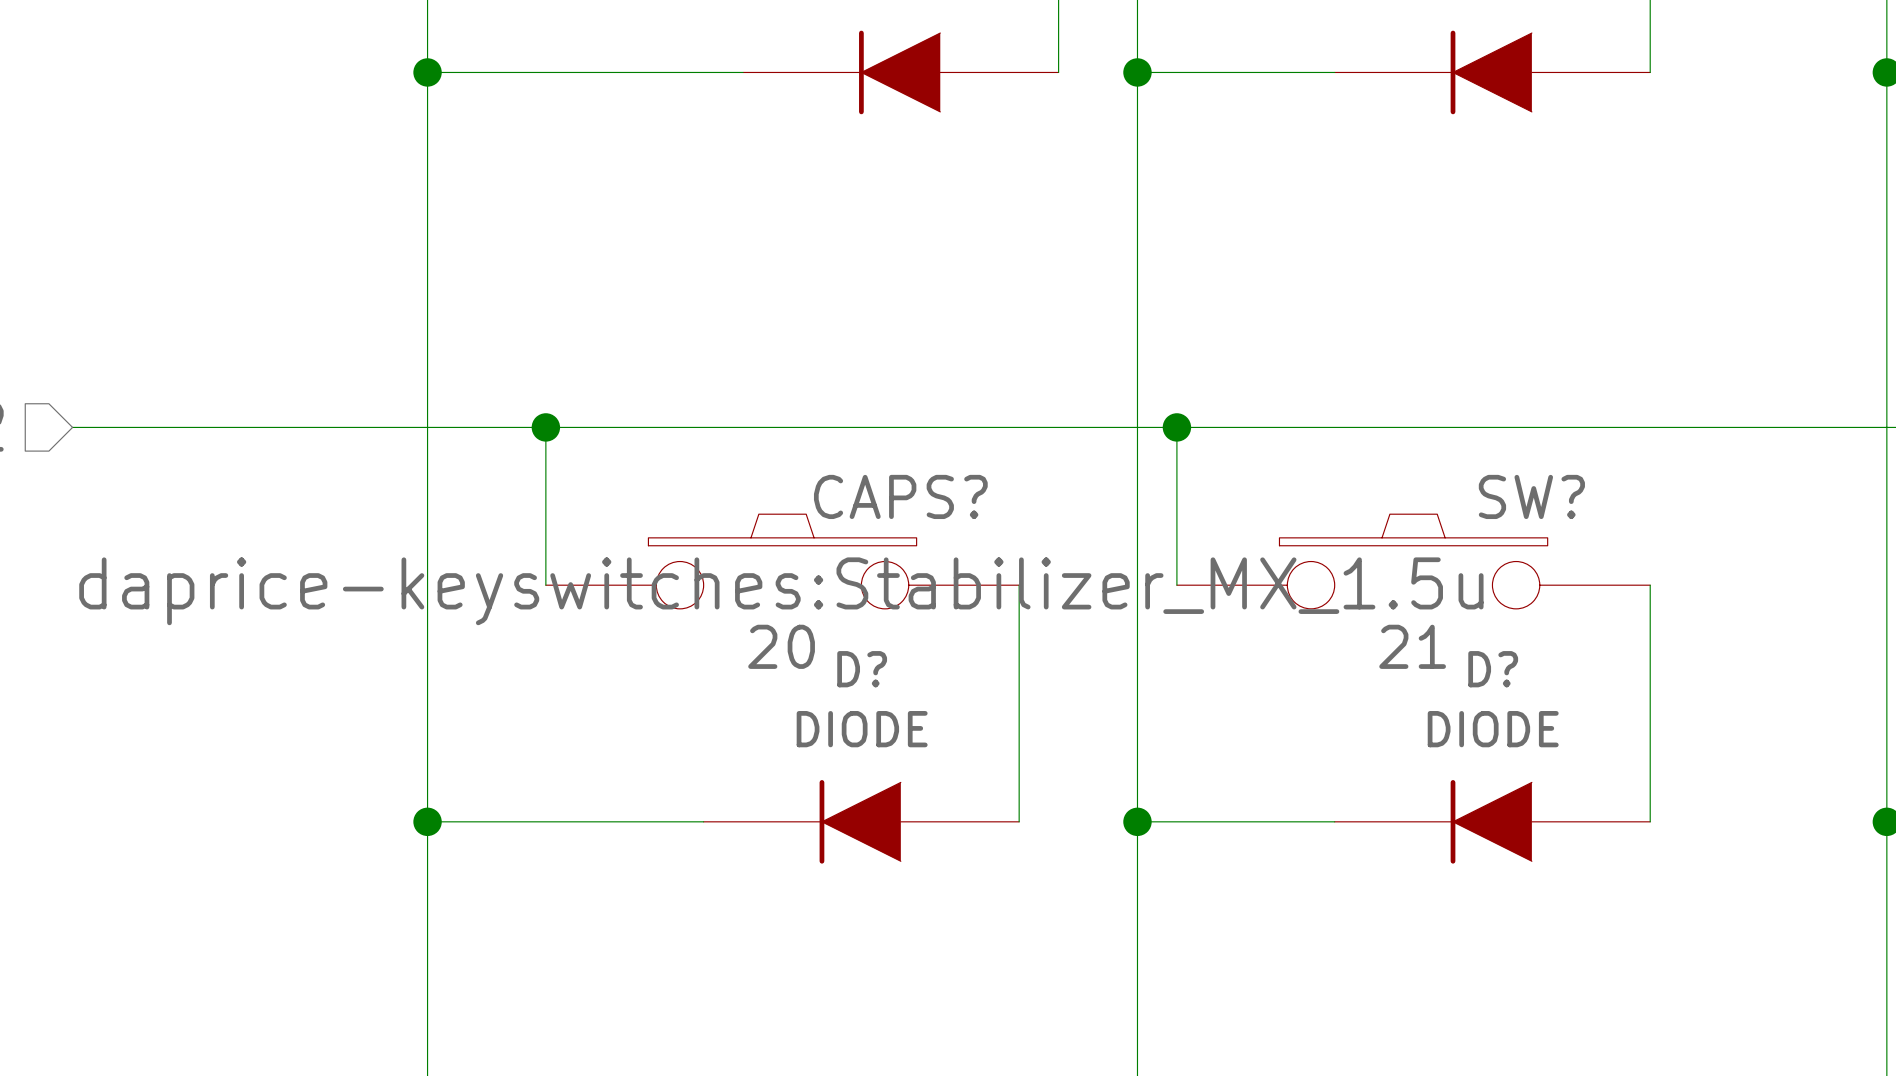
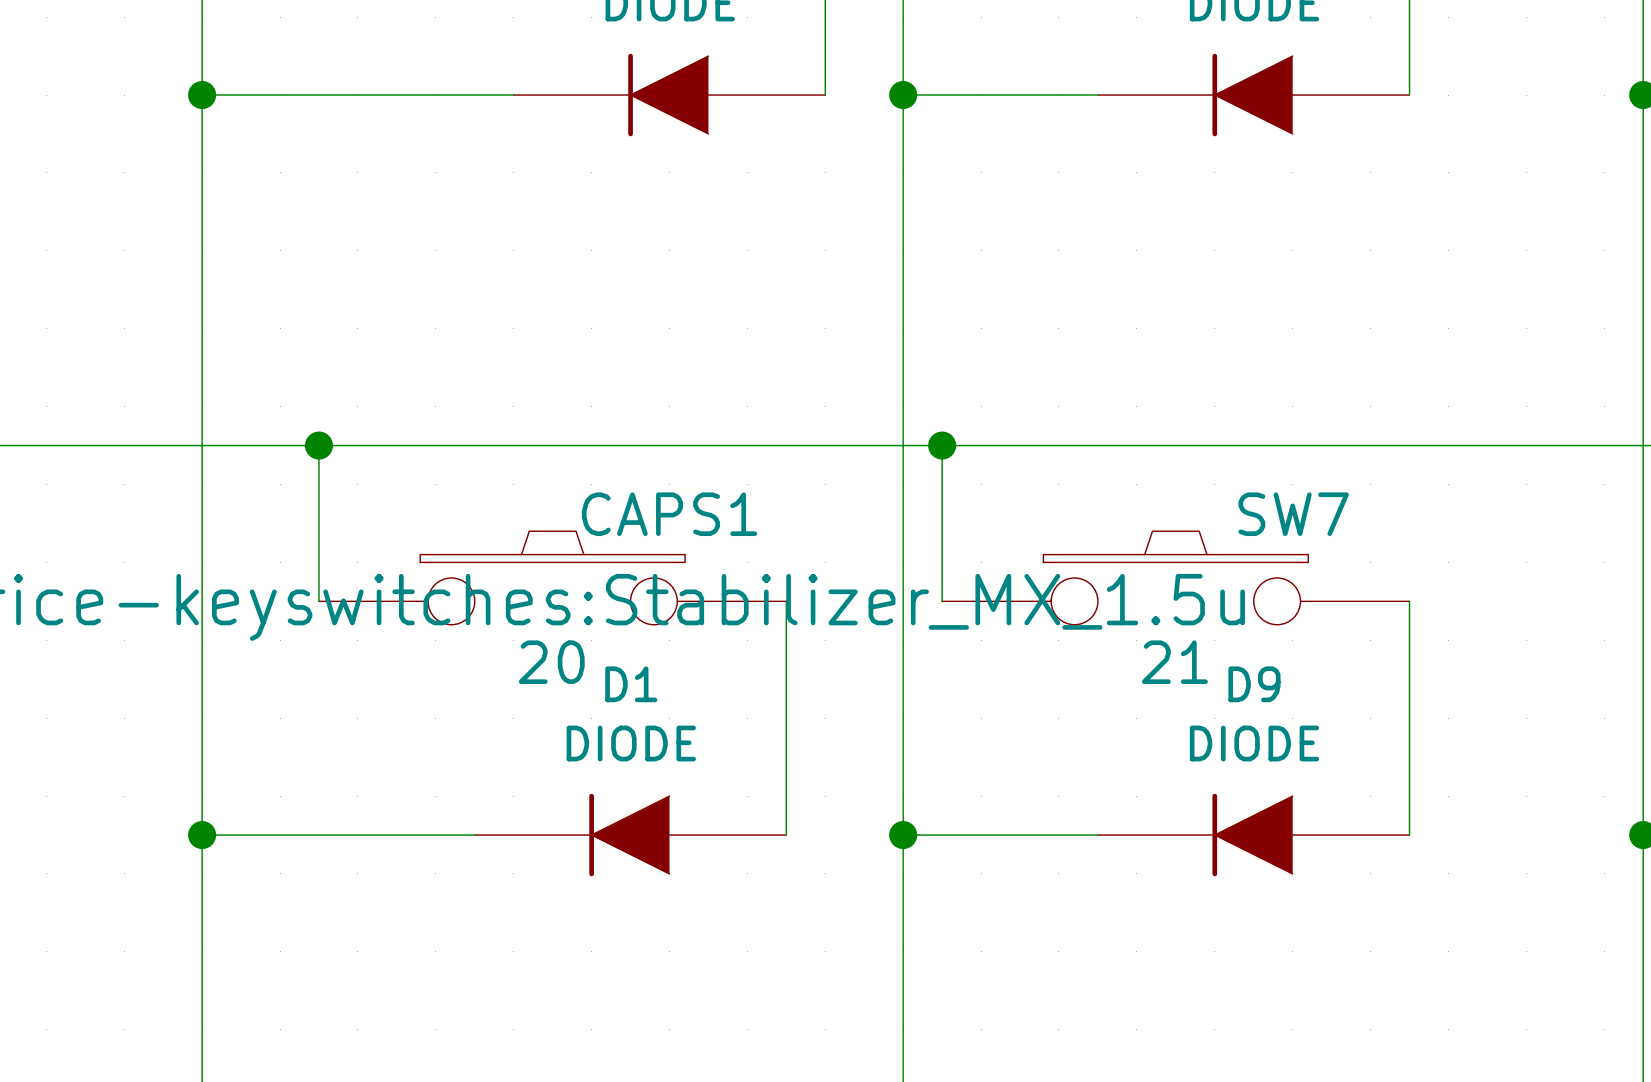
CAPS? name: CAPS? (900, 496) -> CAPS1 (669, 514)
SW? name: SW? (1531, 496) -> SW7 (1293, 514)
D? name: D? (862, 669) -> D1 (631, 684)
D? name: D? (1493, 669) -> D9 (1254, 684)

